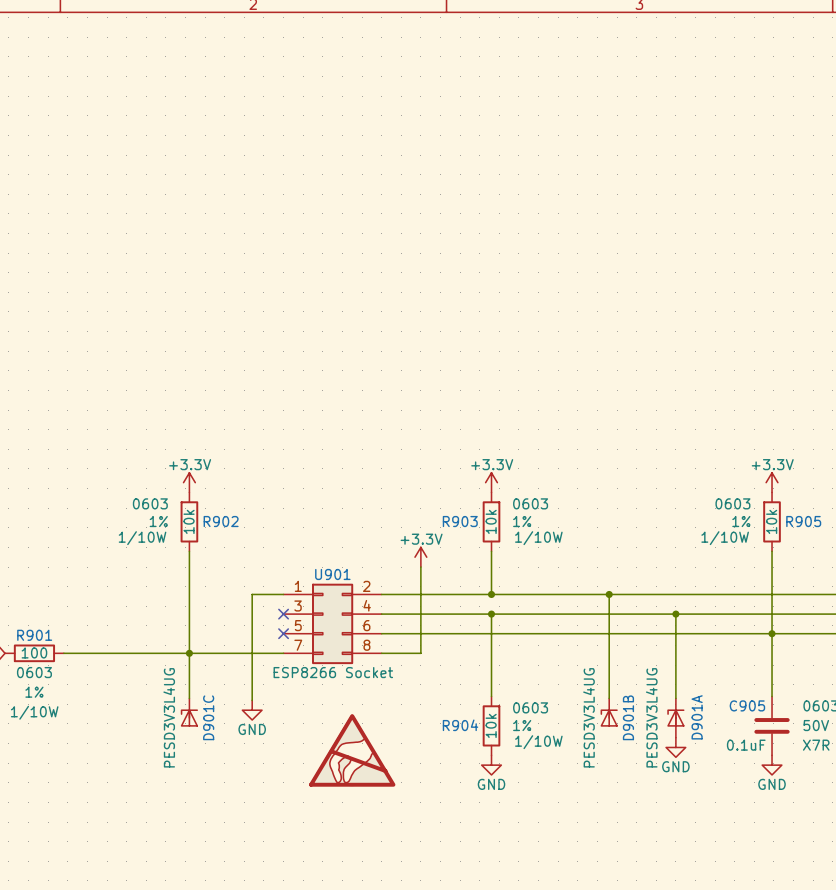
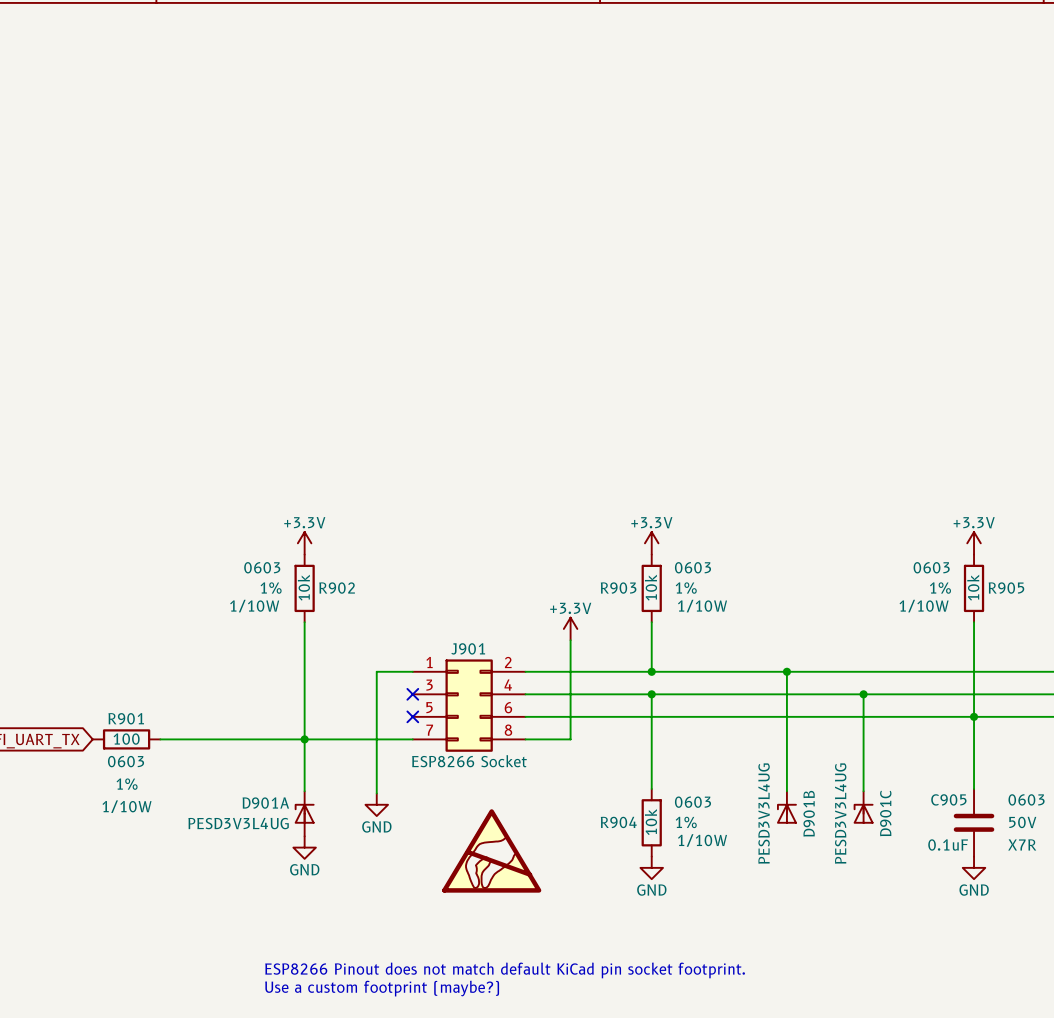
U901 name: U901 (332, 574) -> J901 (468, 648)
D901C position: (189, 712) -> (863, 807)
D901A value rotation: 0° (651, 717) -> 90° clockwise (238, 823)
D901A name rotation: 0° (697, 717) -> 90° clockwise (265, 803)
D901A name position: D901A (697, 717) -> D901A (265, 803)
D901A position: (675, 718) -> (304, 813)
power symbol: none -> GND (304, 847)
power symbol: GND (675, 747) -> none
text: none -> ESP8266 Pinout does not match default KiCad pin socket footprint. (505, 970)
text: none -> Use a custom footprint (maybe?) (382, 988)

